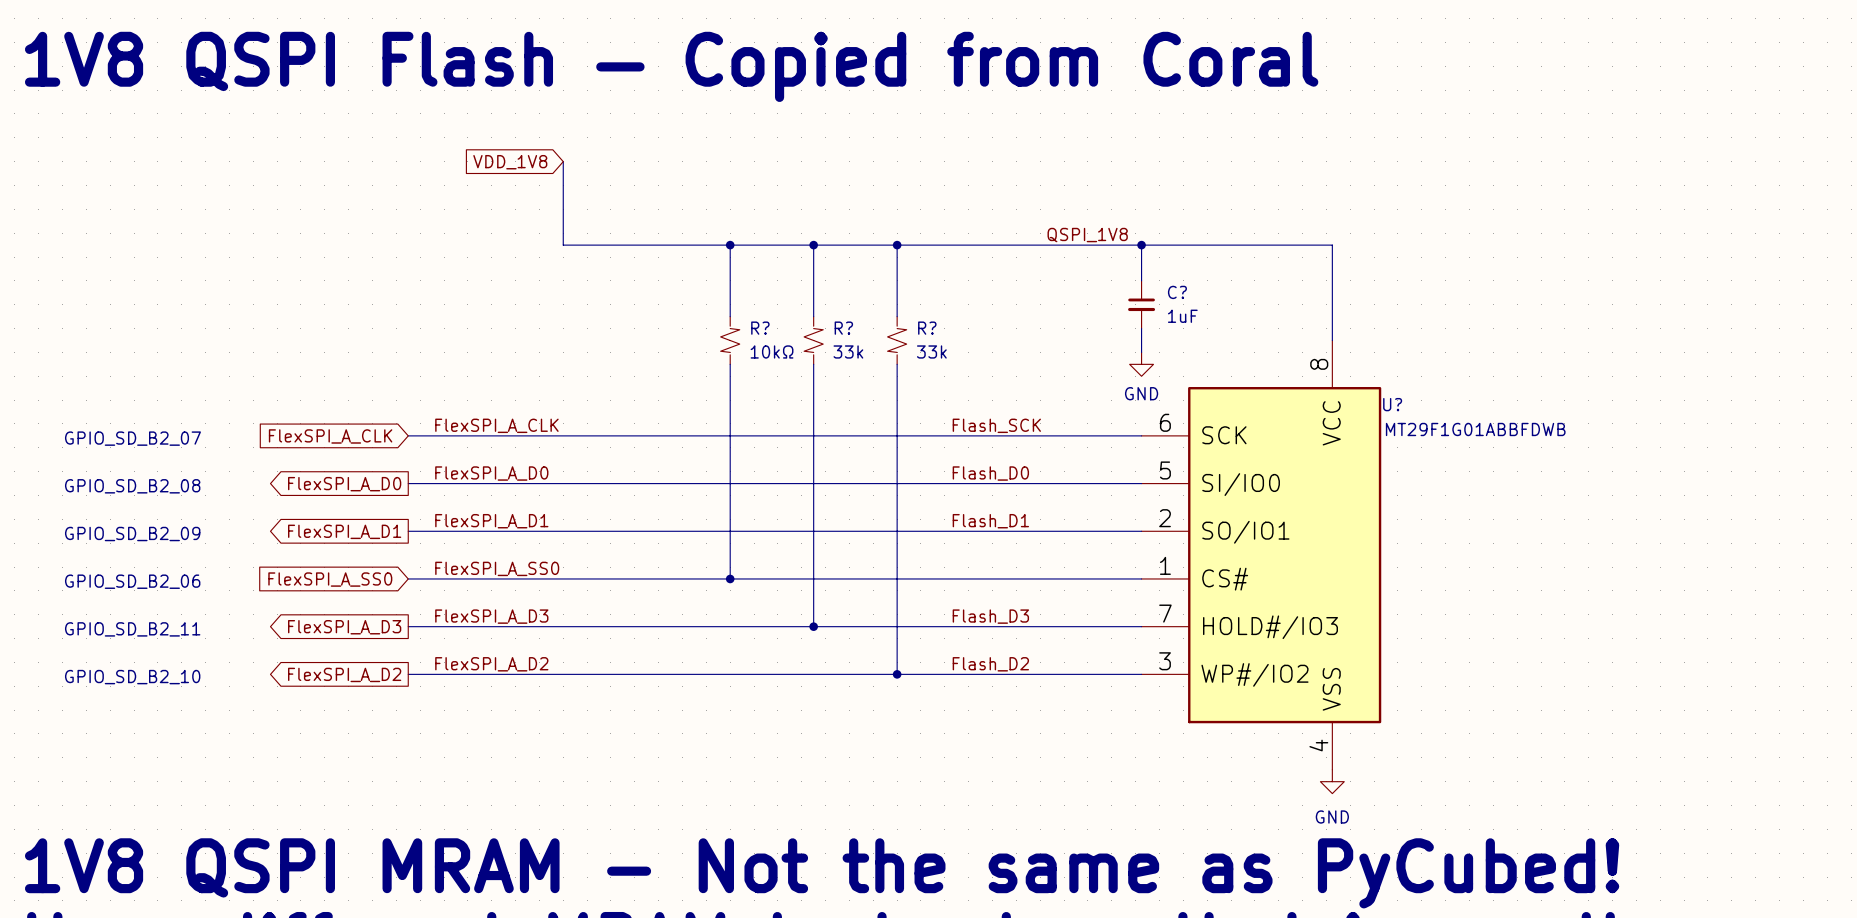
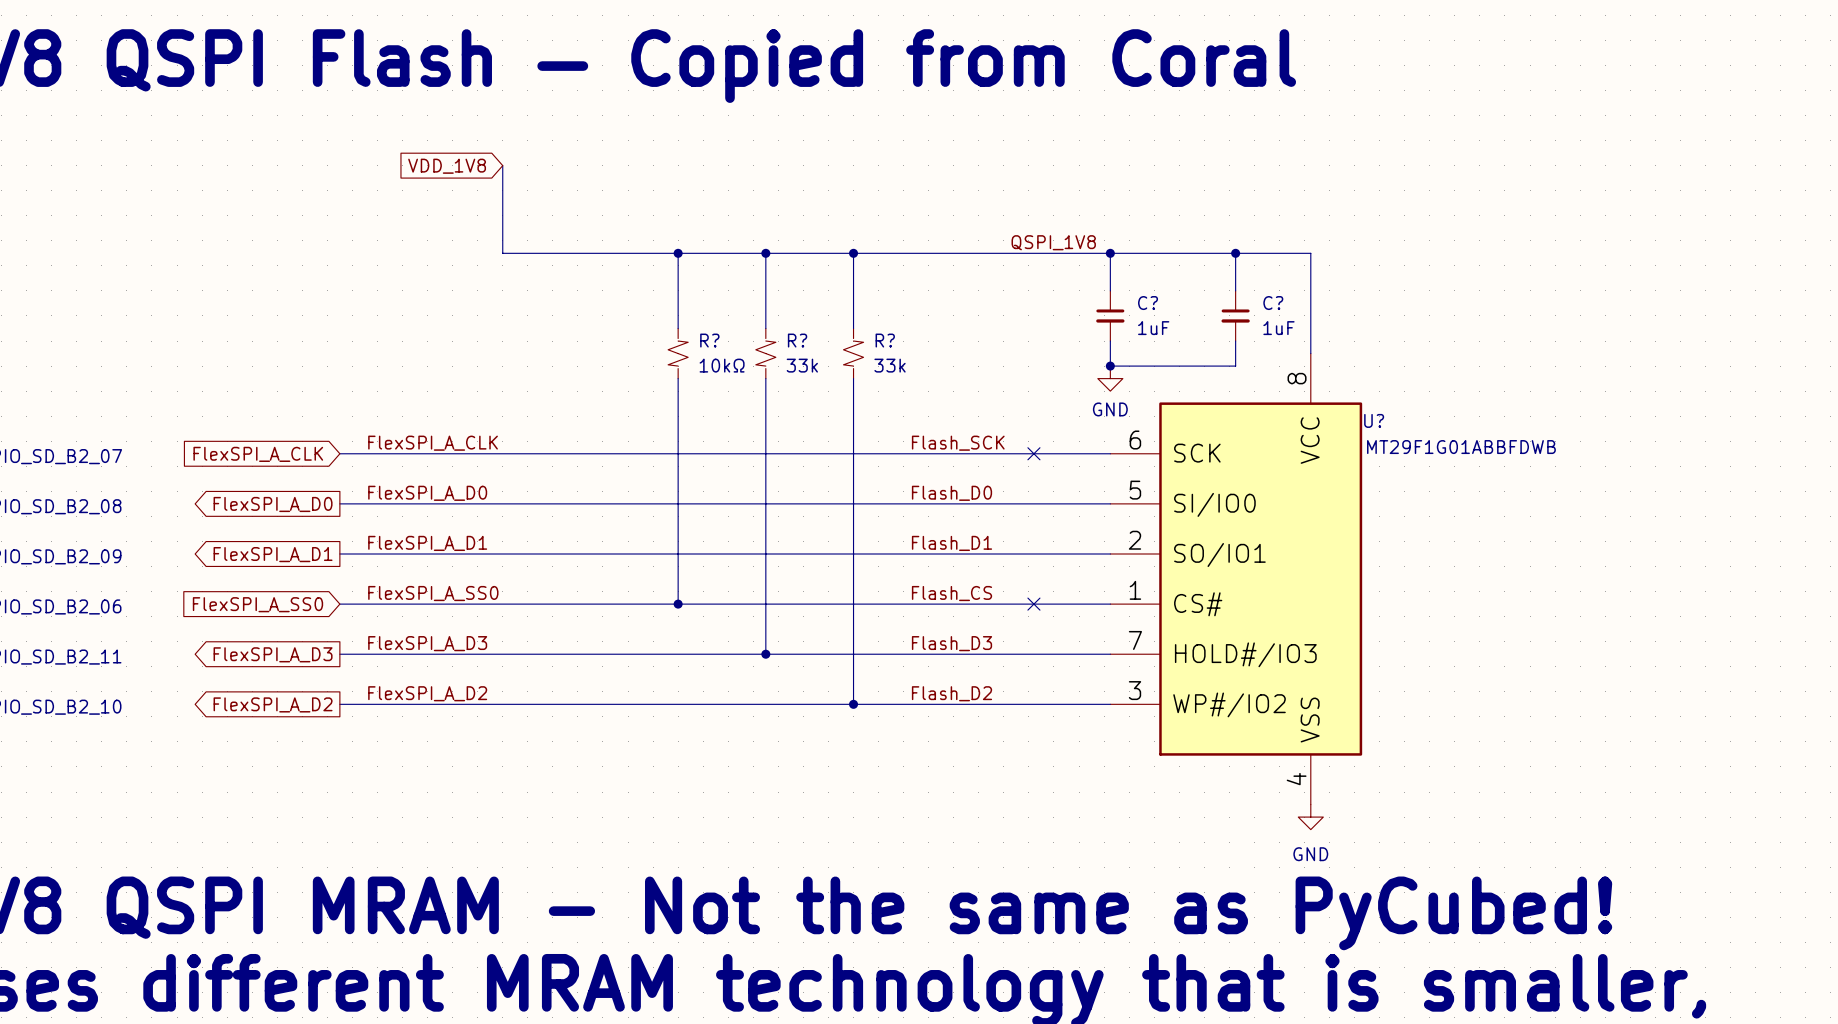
wire: none -> (1235, 253) (1235, 290)
junction: none -> (1235, 253)
C?: none -> 1uF (1235, 315)
wire: none -> (1235, 341) (1235, 366) (1110, 366)
junction: none -> (1110, 366)
no-connect mark: none -> (1033, 453)
label: none -> Flash_CS (952, 593)
no-connect mark: none -> (1033, 604)

